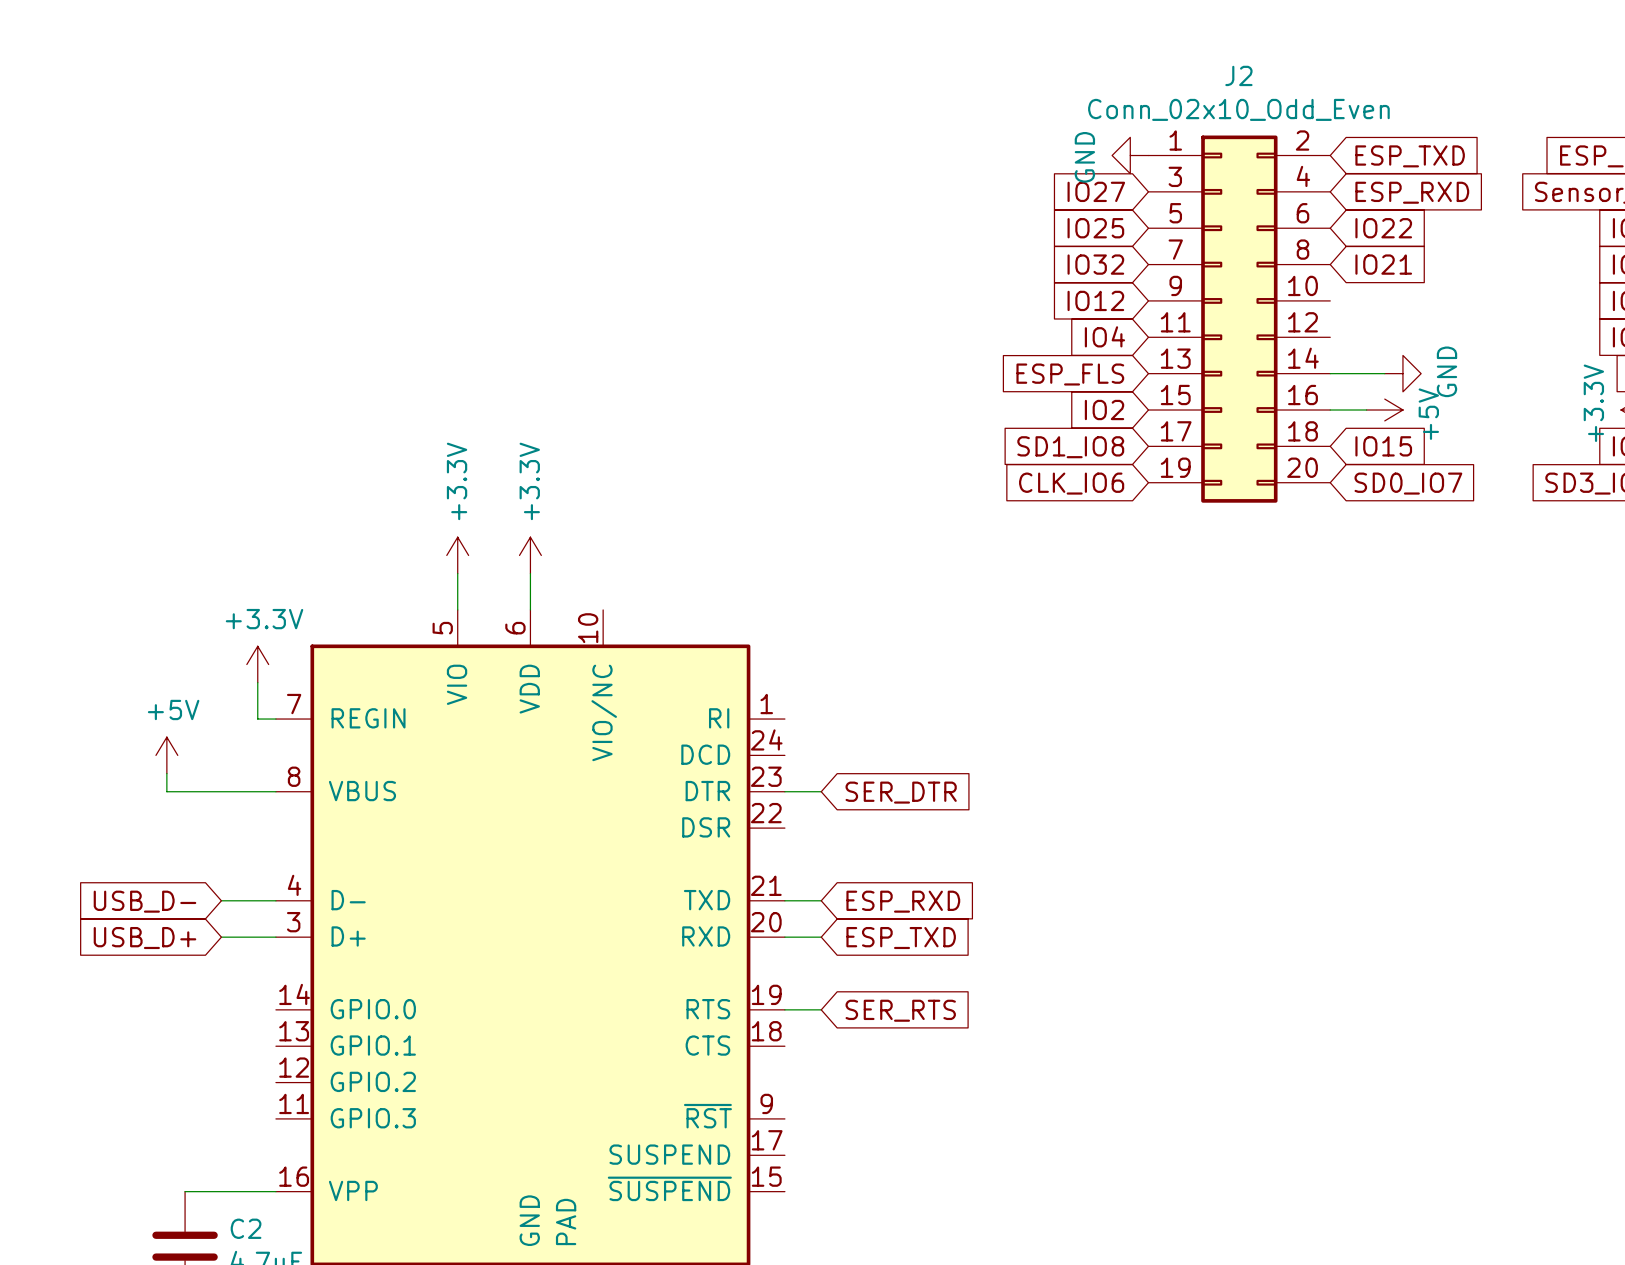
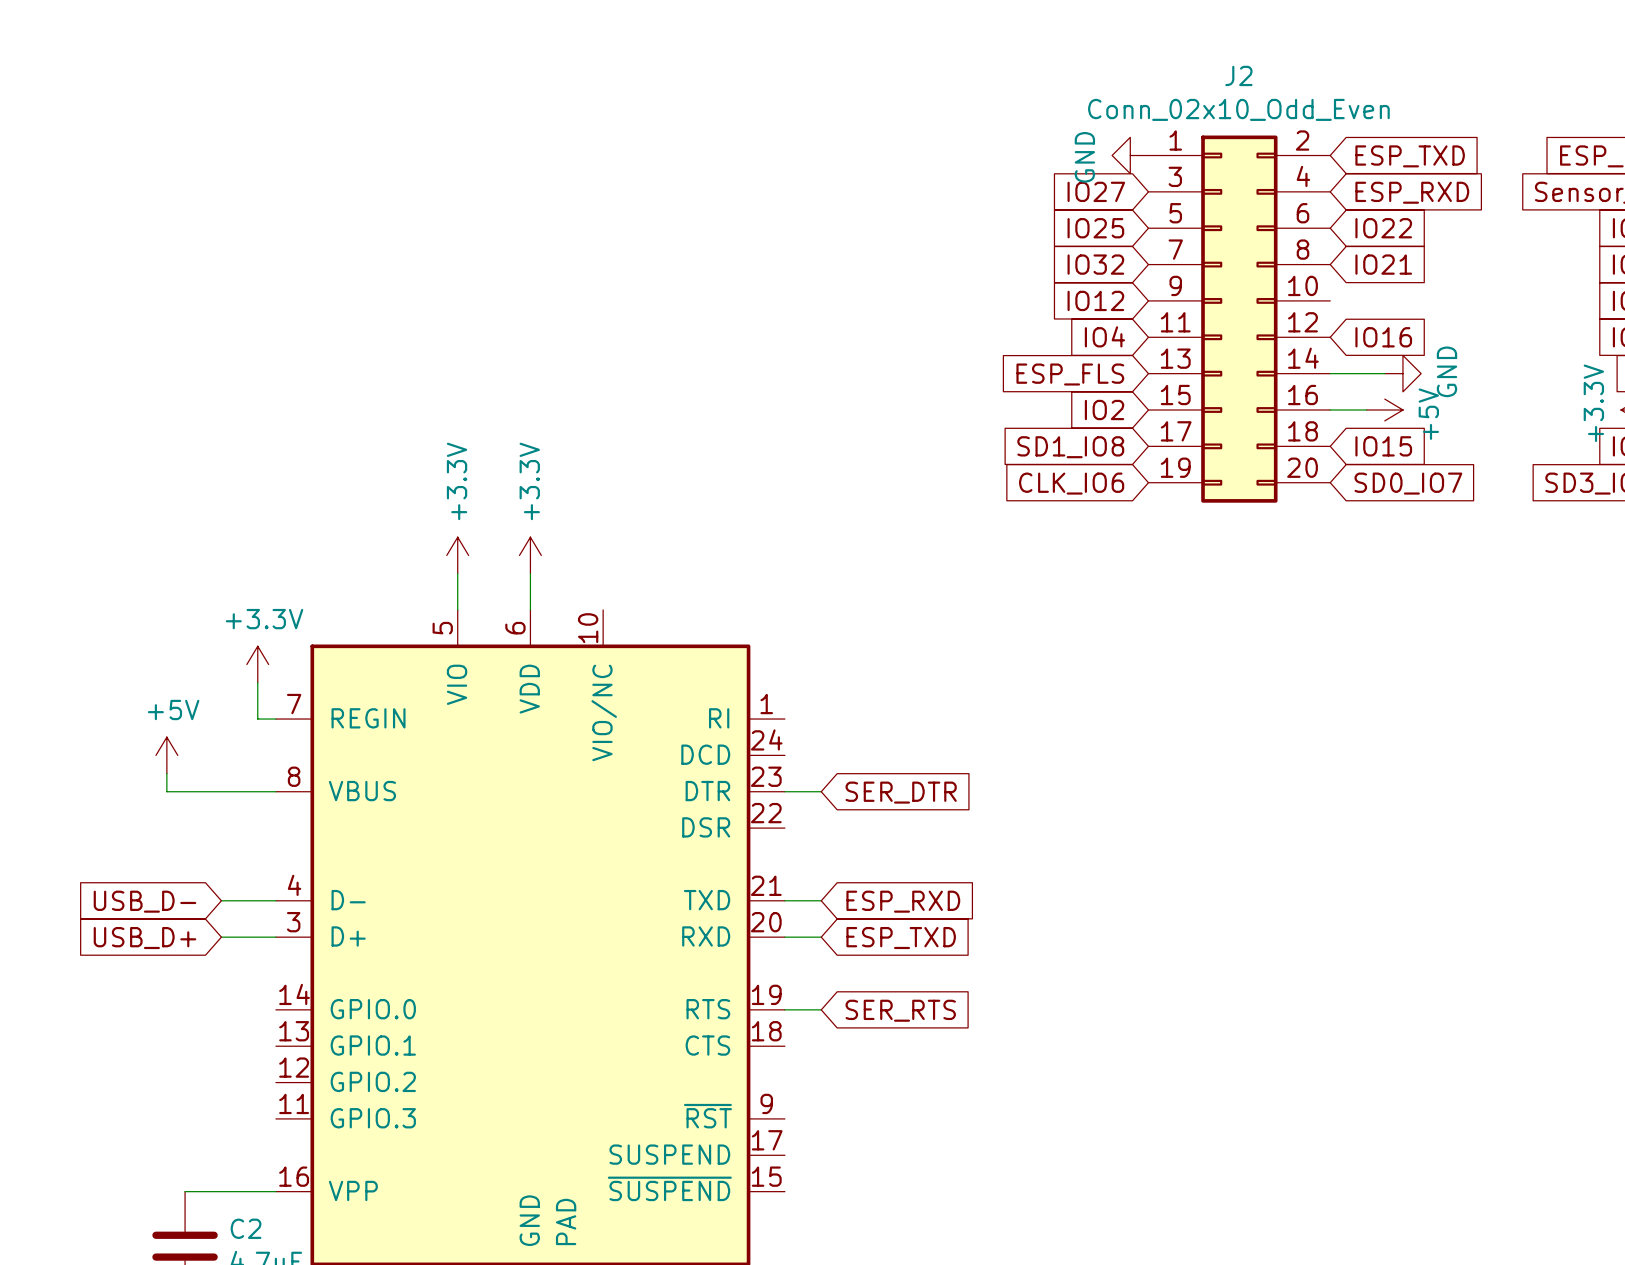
global label: none -> IO16 (1383, 337)

